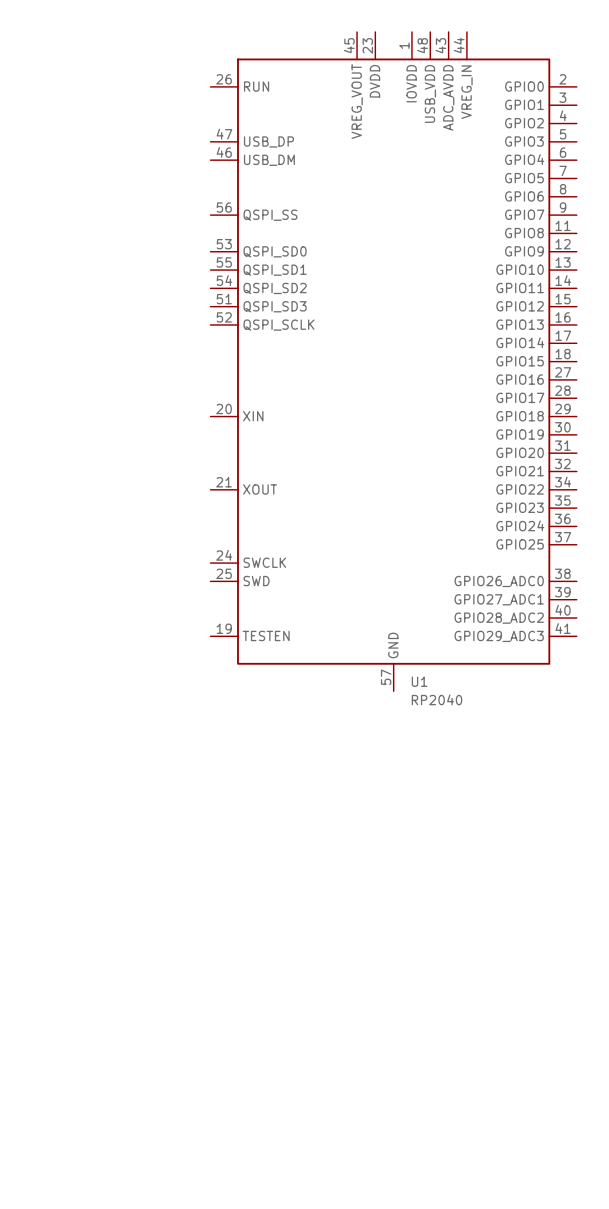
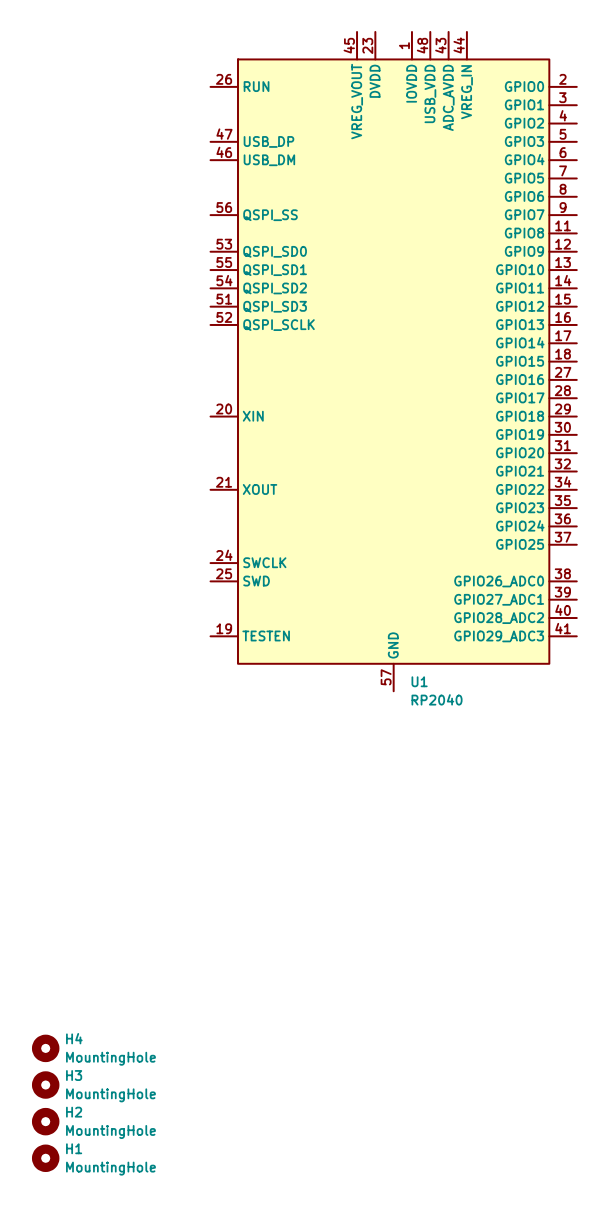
H4: none -> MountingHole (45, 1048)
H3: none -> MountingHole (45, 1085)
H2: none -> MountingHole (45, 1121)
H1: none -> MountingHole (45, 1158)

